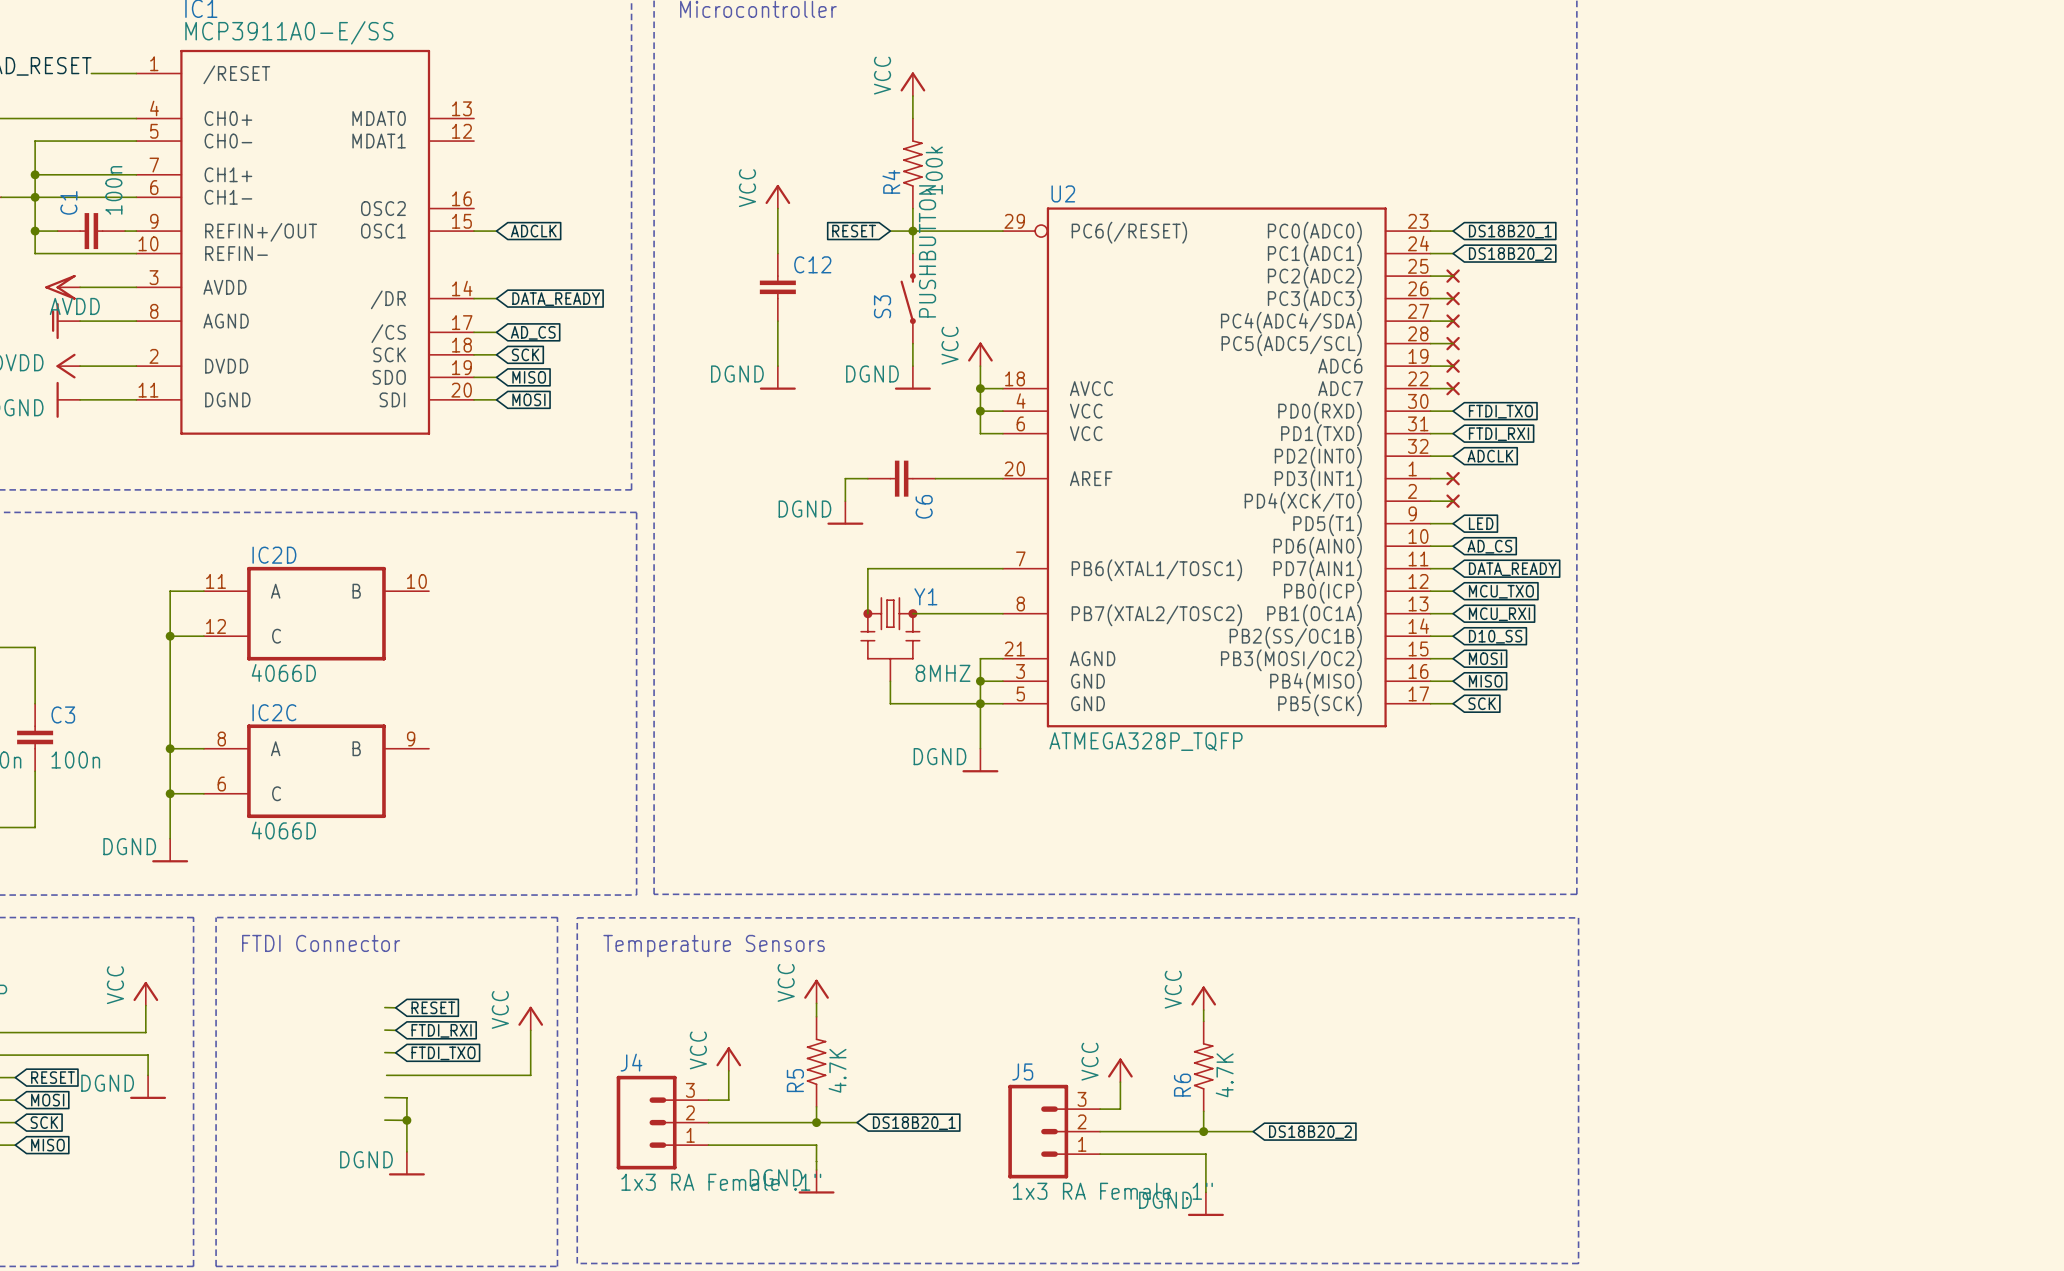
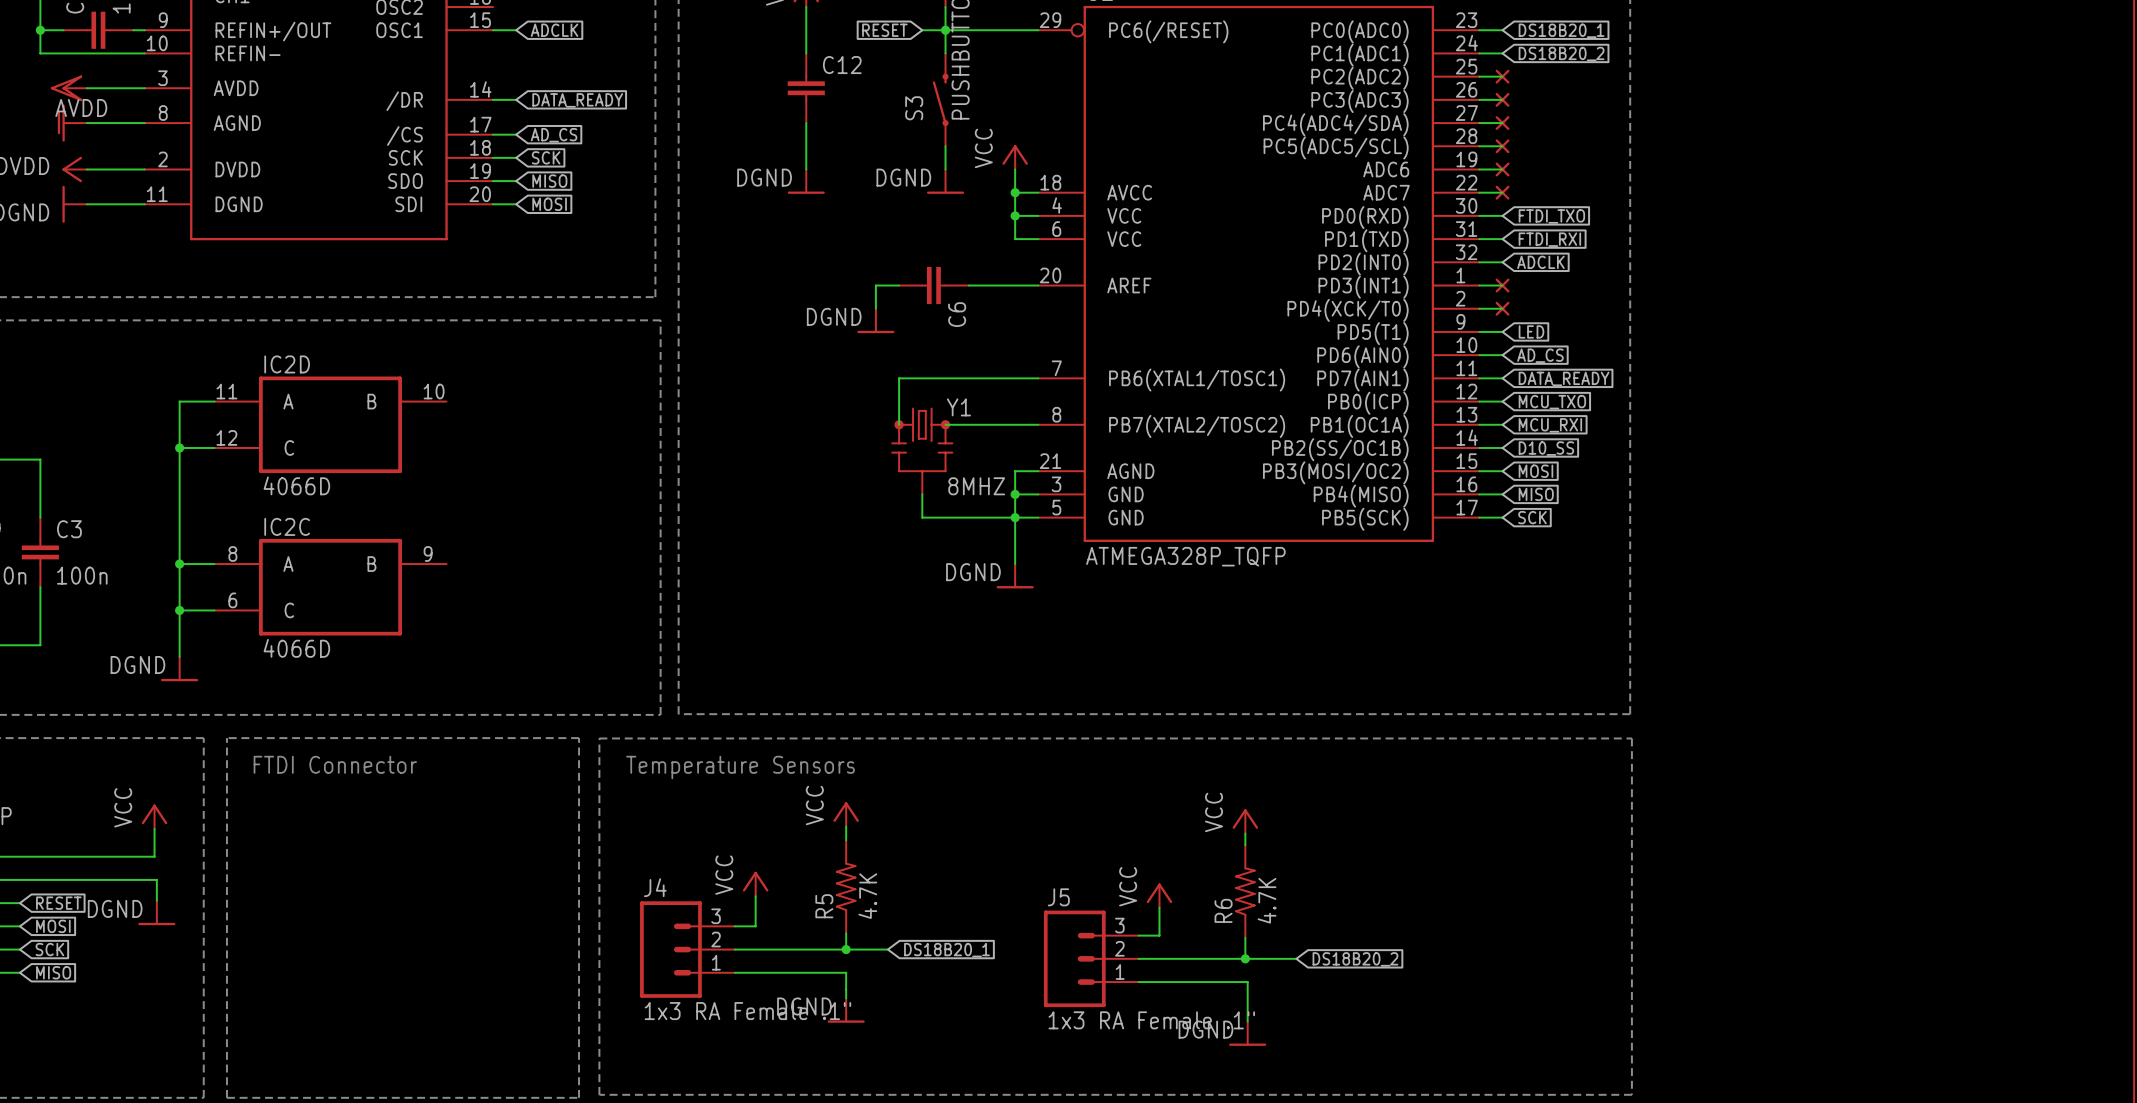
wire: (384, 1007) (395, 1007) -> none
global label: RESET (433, 1007) -> none
power symbol: VCC (530, 1018) -> none
wire: (384, 1030) (395, 1030) -> none
global label: FTDI_RXI (441, 1030) -> none
wire: (530, 1030) (530, 1075) (386, 1075) -> none
wire: (384, 1052) (395, 1052) -> none
global label: FTDI_TXO (443, 1053) -> none
wire: (384, 1097) (406, 1097) (406, 1151) -> none
wire: (384, 1120) (406, 1120) -> none
junction: (406, 1120) -> none
power symbol: DGND (406, 1163) -> none

